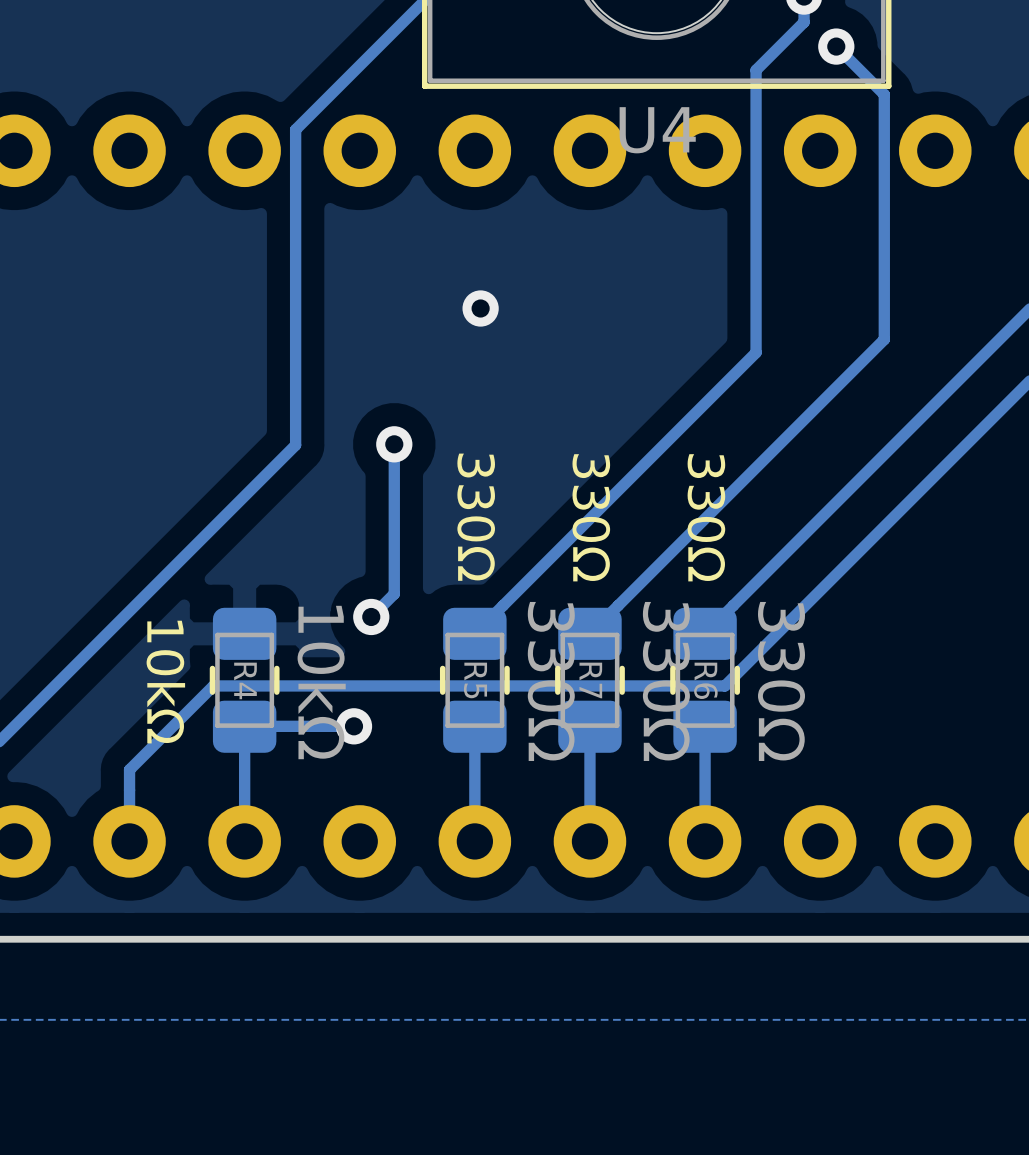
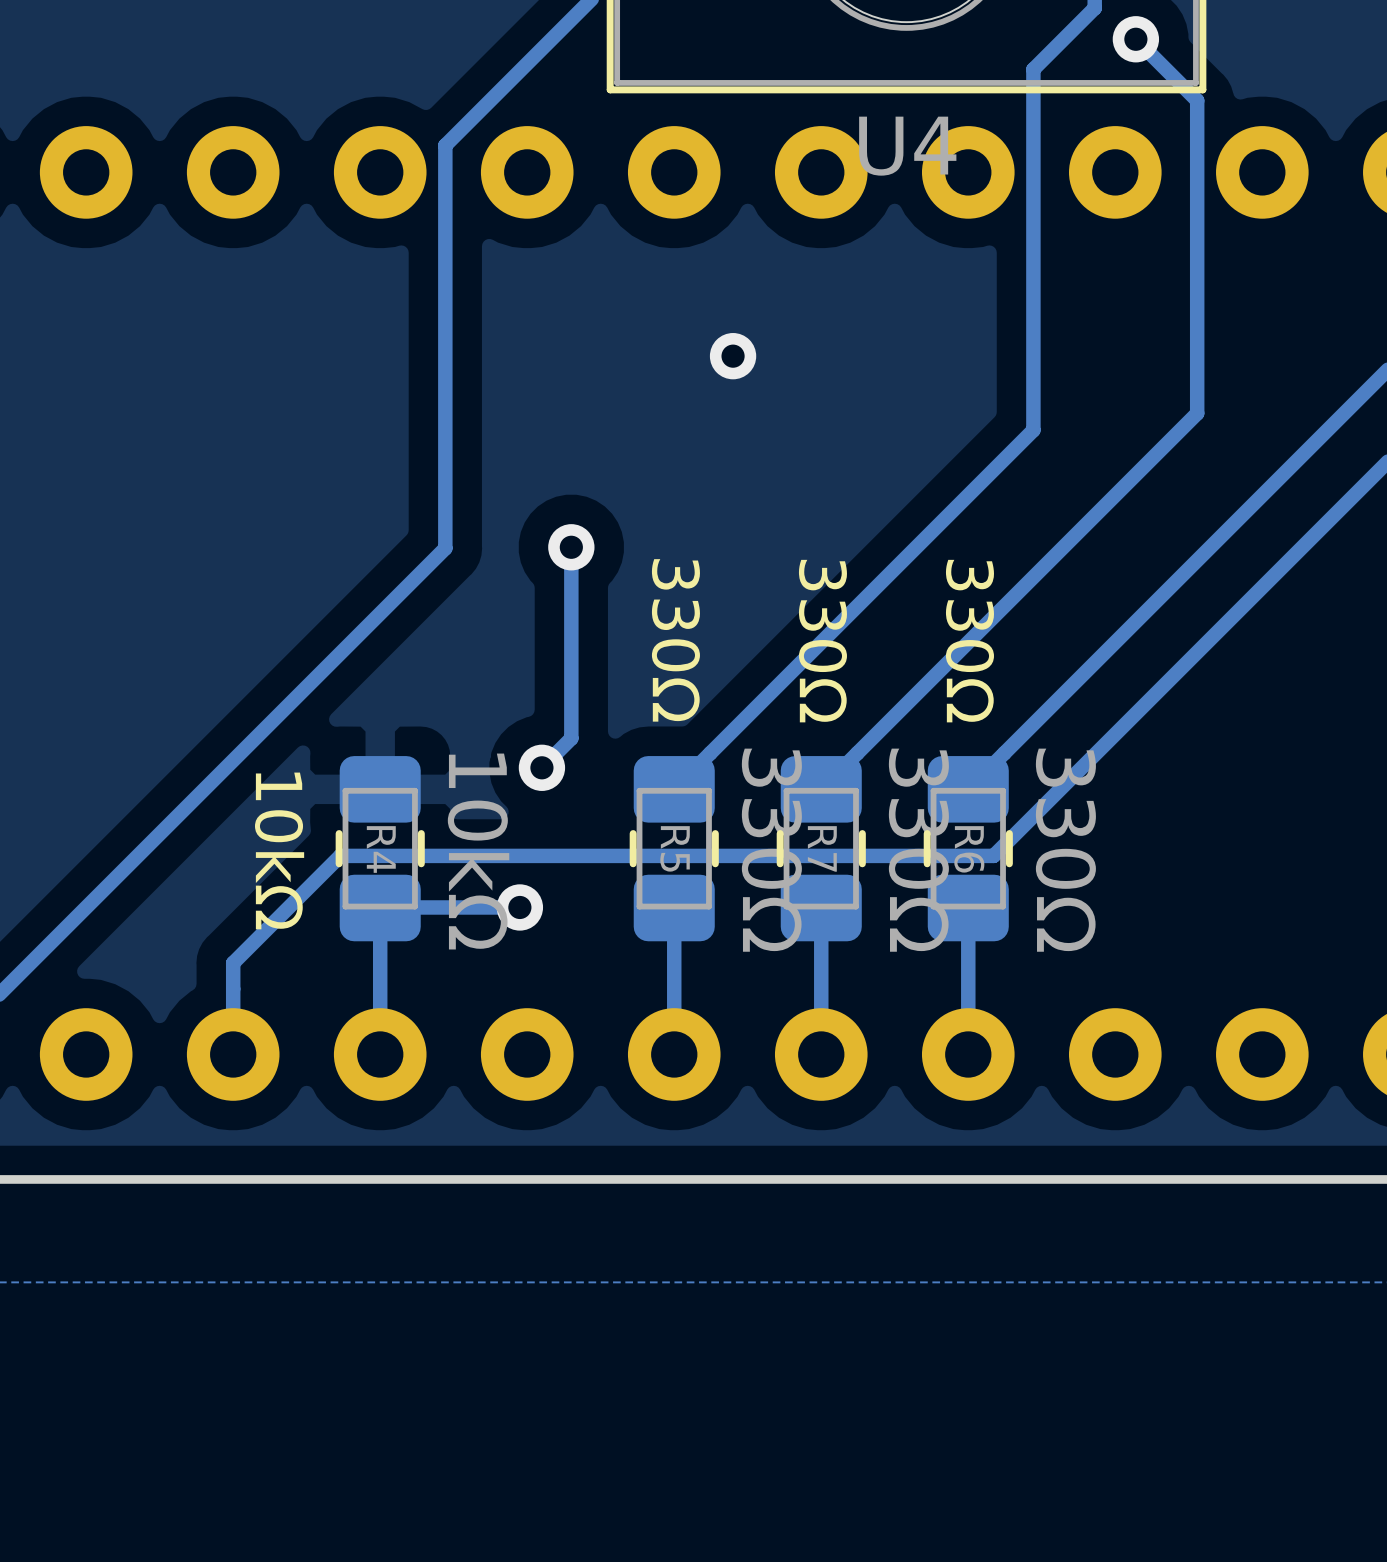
via position: (480, 308) -> (733, 356)

